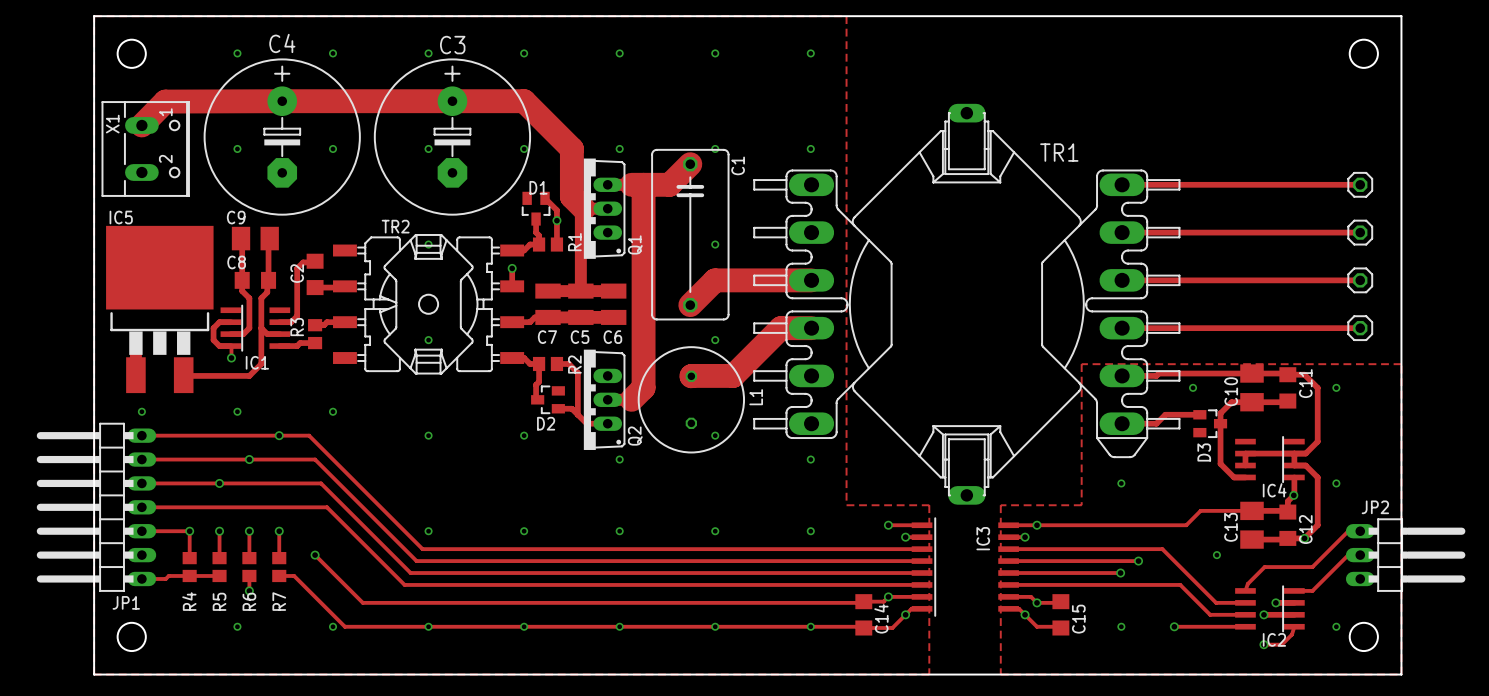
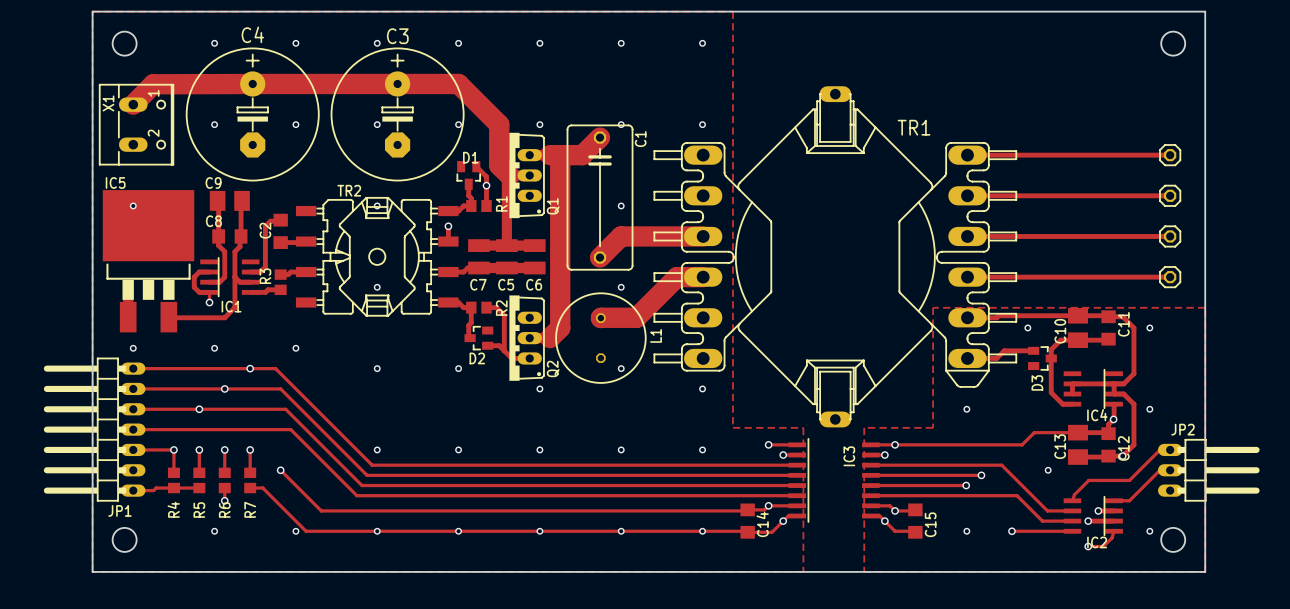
via: none -> (133, 205)

